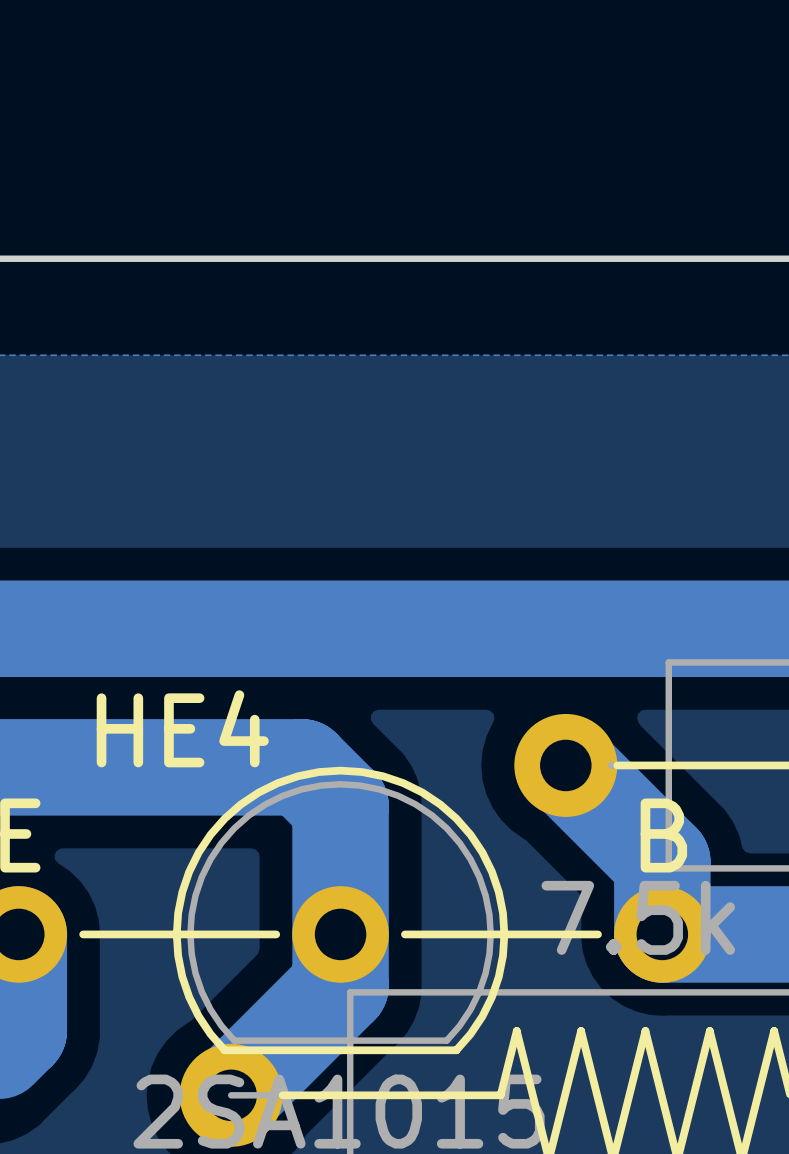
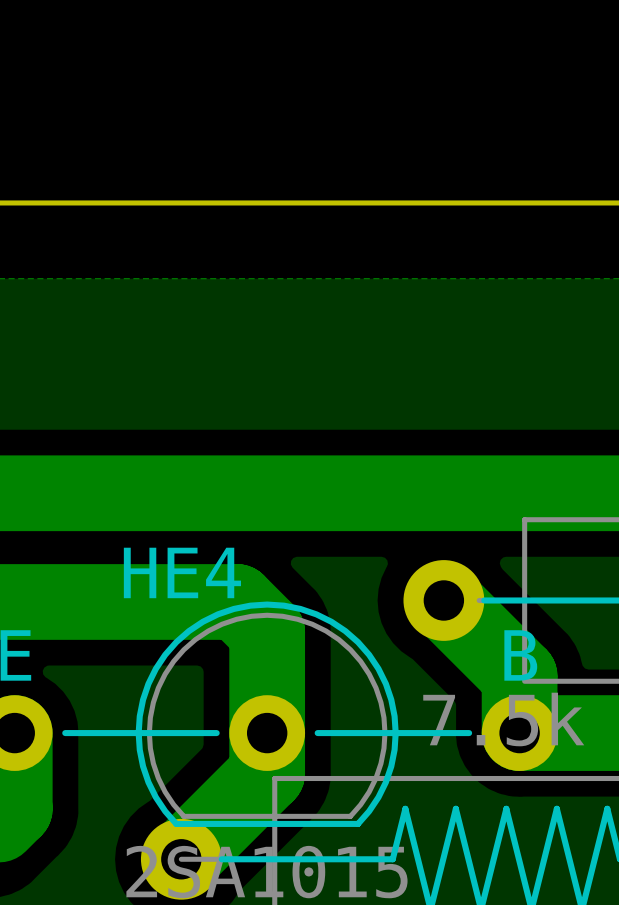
HE4 name position: HE4 (182, 728) -> HE4 (182, 572)

